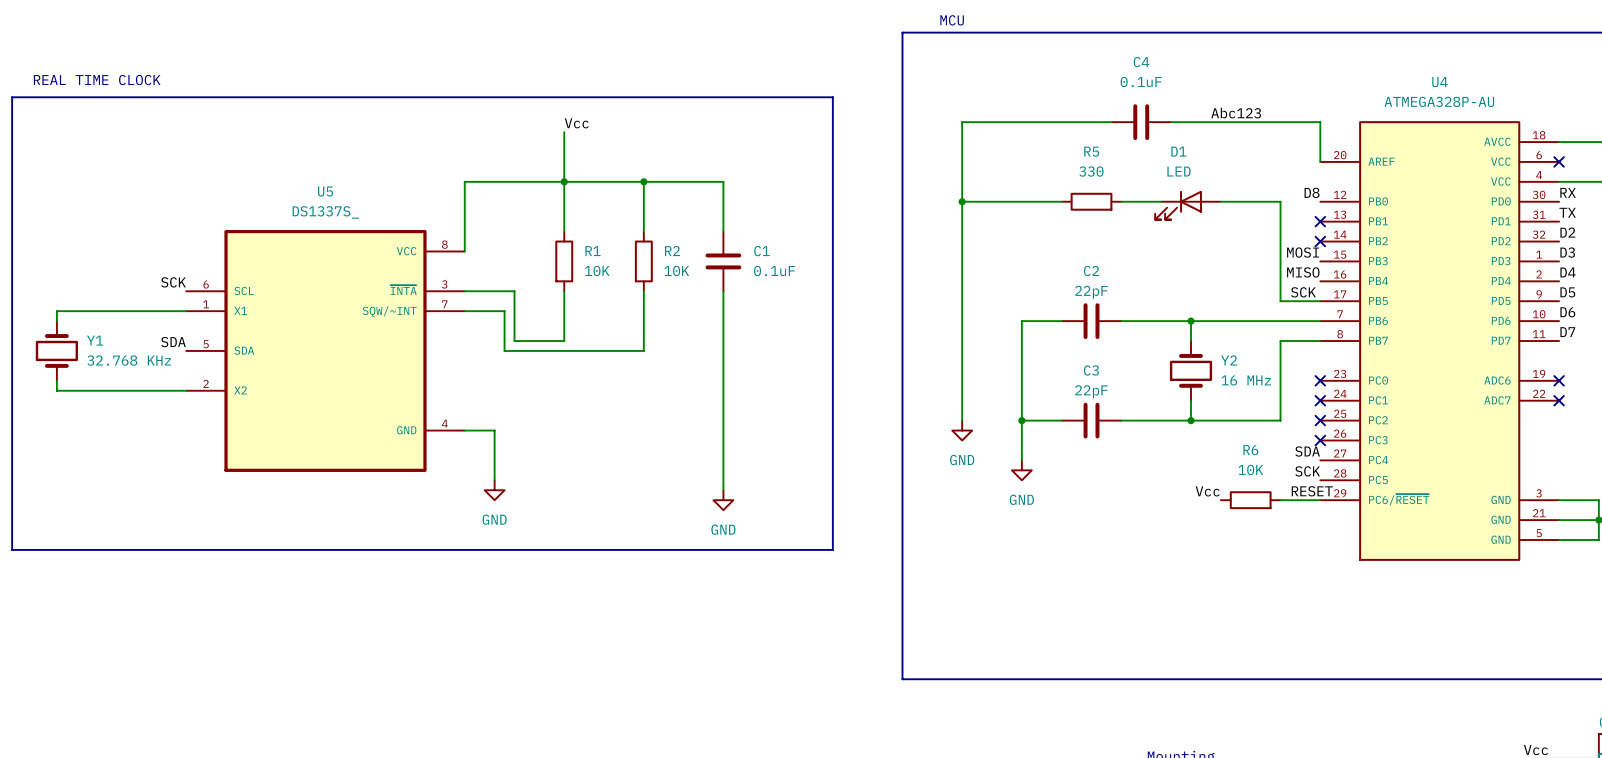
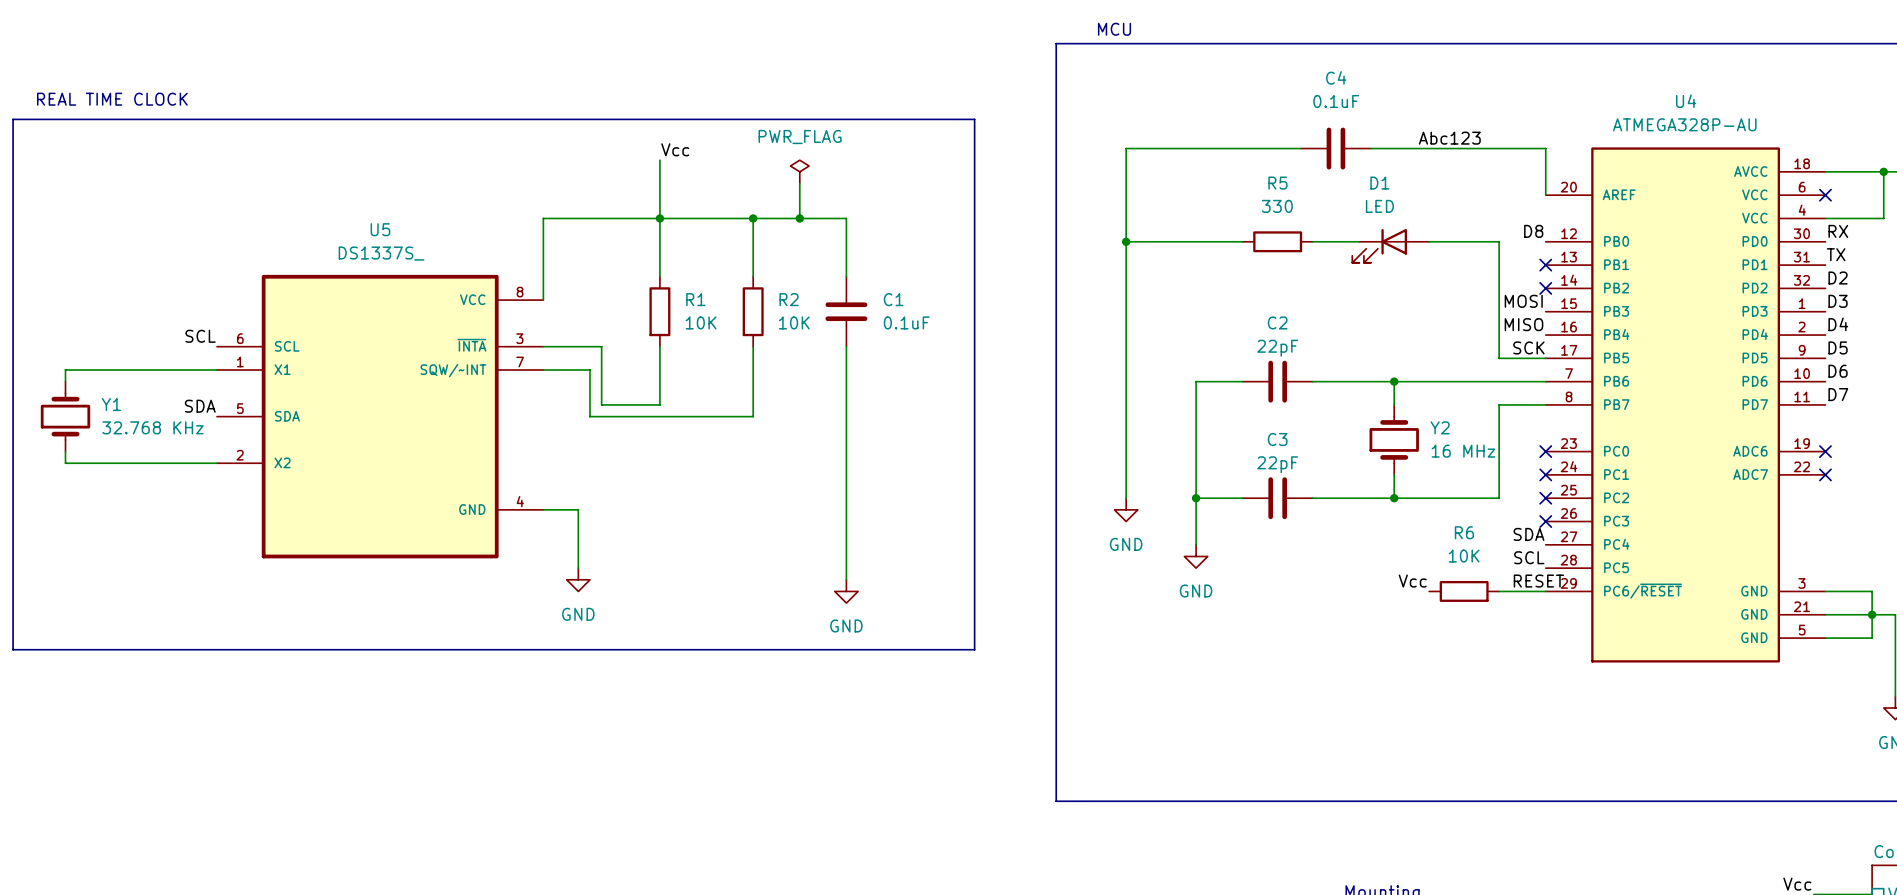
power symbol: none -> PWR_FLAG (799, 171)
wire: none -> (799, 183) (799, 218)
junction: none -> (799, 218)
label: SCK (173, 282) -> SCL (200, 336)
label: SCK (1307, 471) -> SCL (1529, 557)

